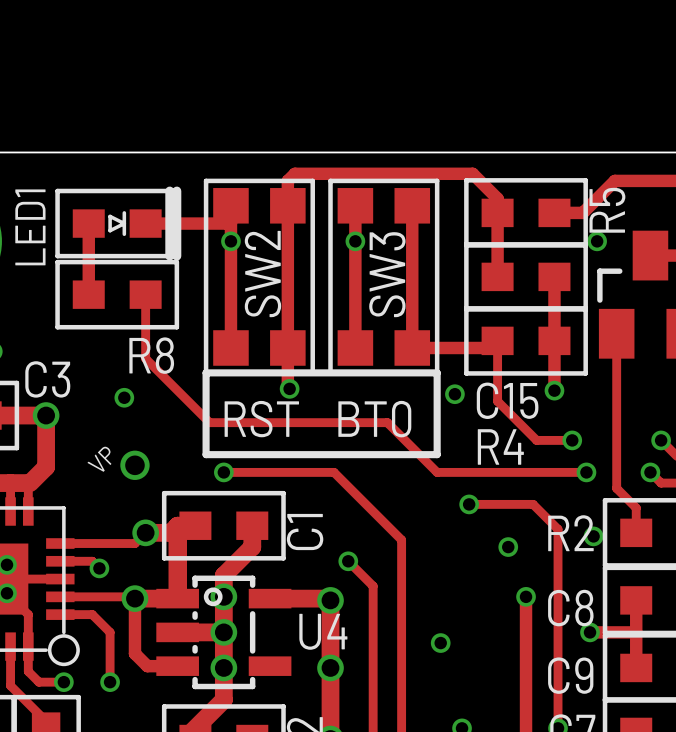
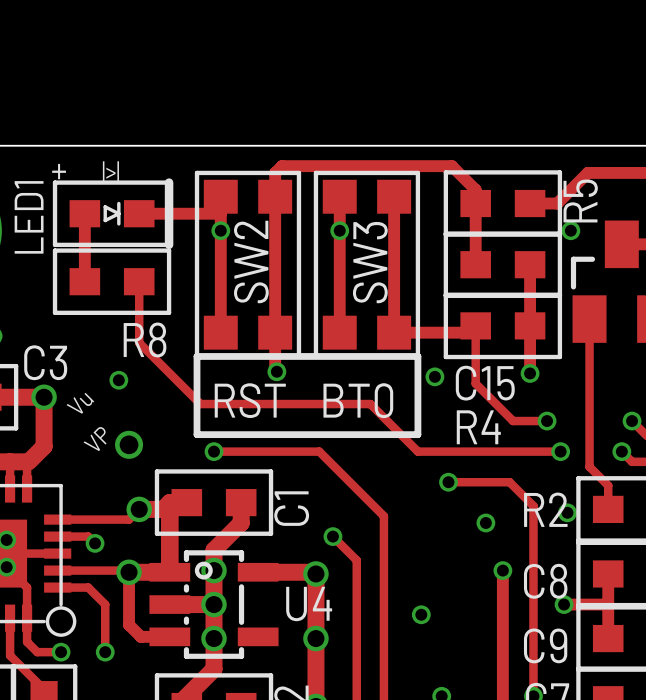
text: none -> + (59, 171)
text: none -> |>| (110, 171)
LED1 footprint: [55, 186, 182, 261] -> [52, 178, 174, 250]
text: none -> Vu (80, 403)

